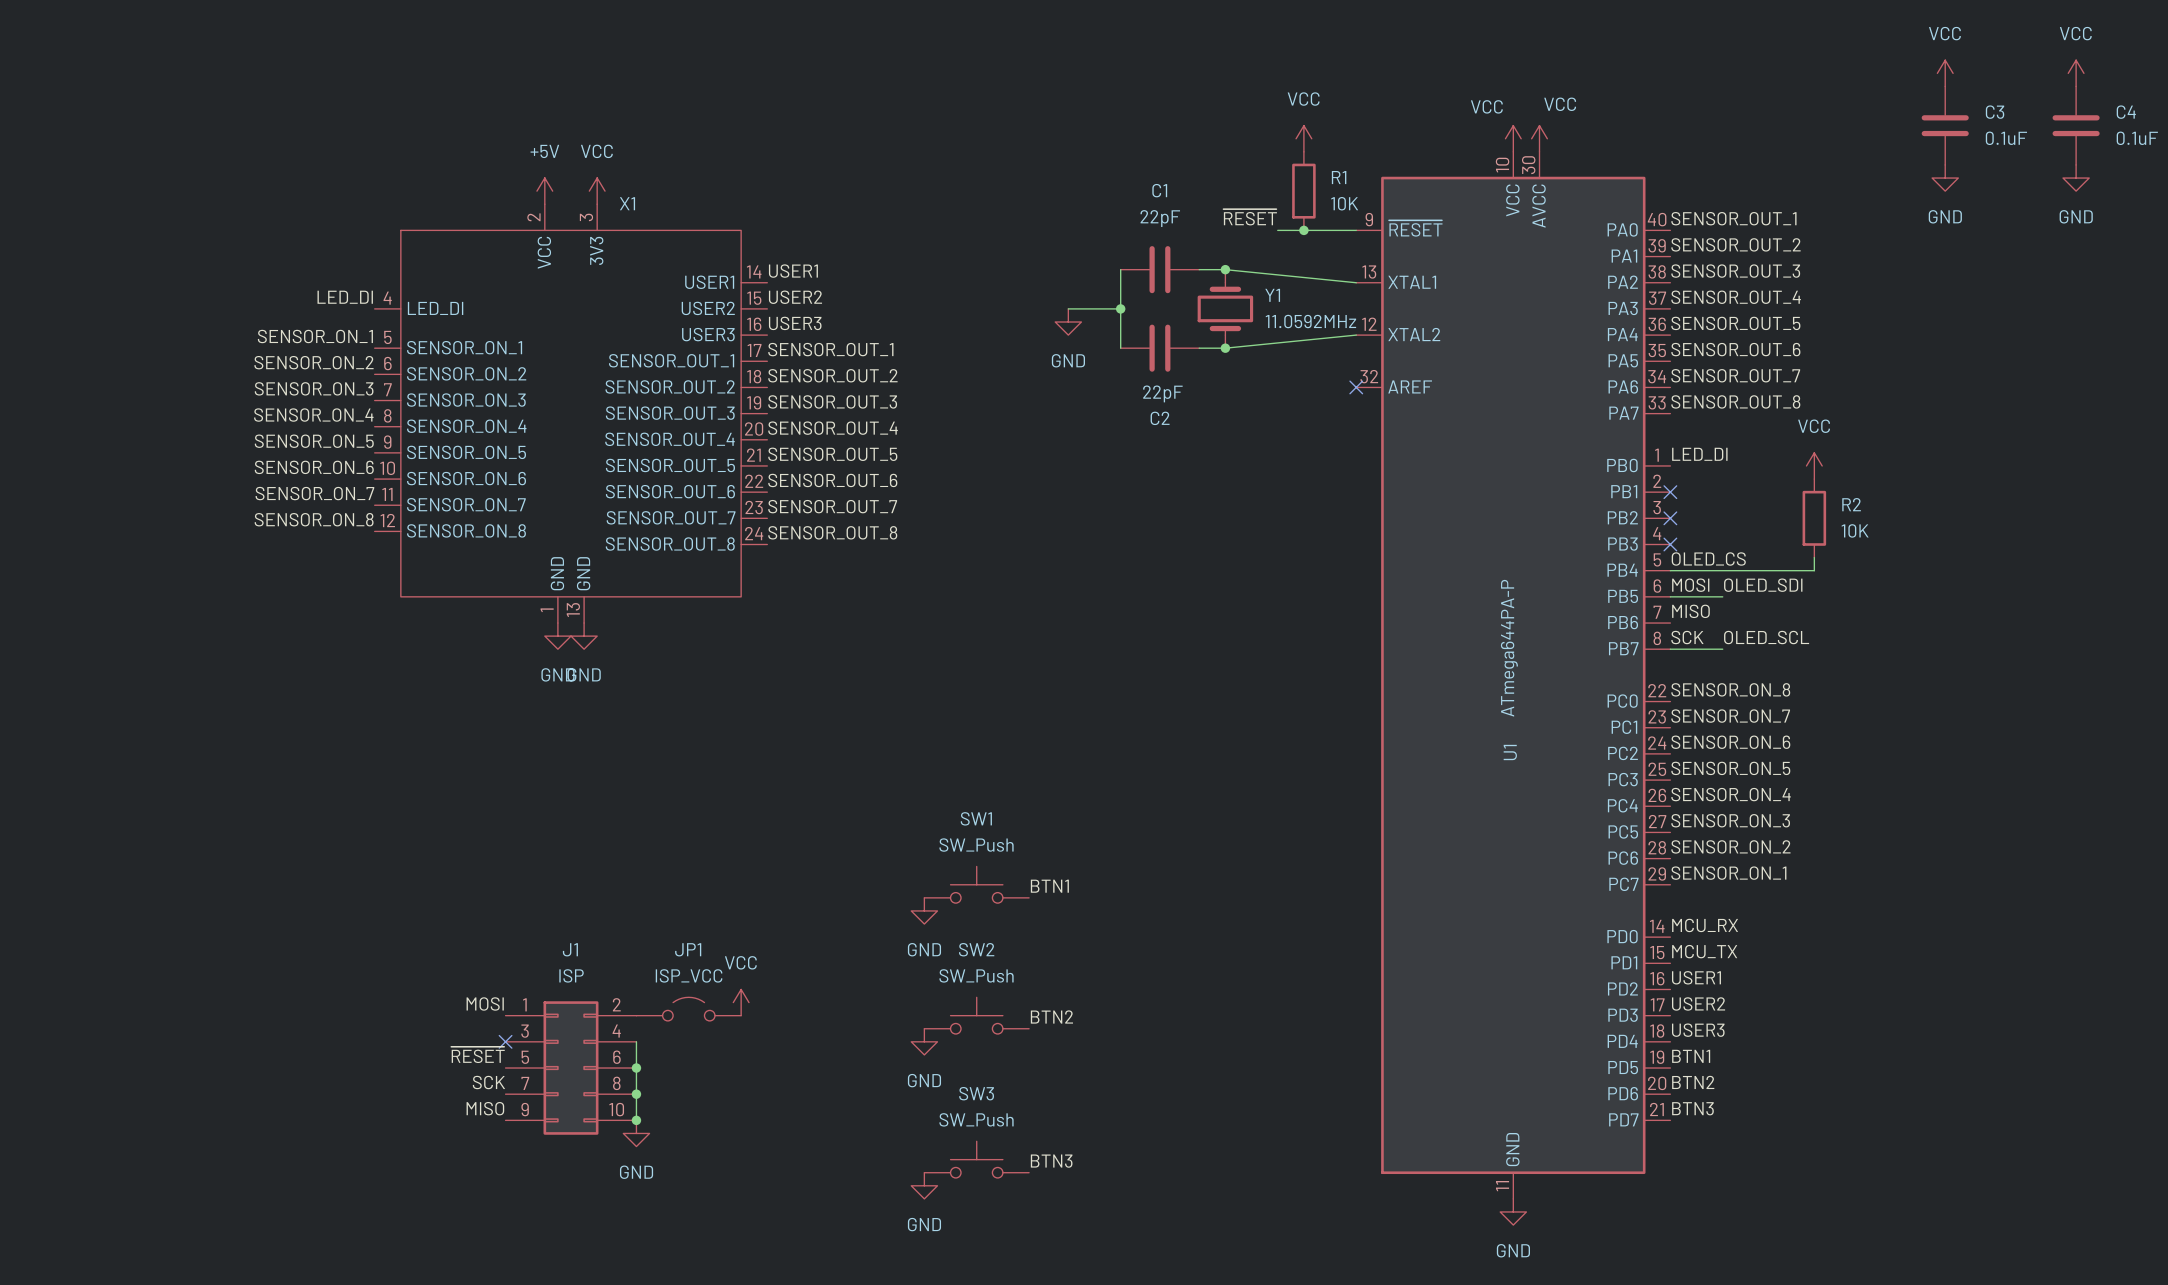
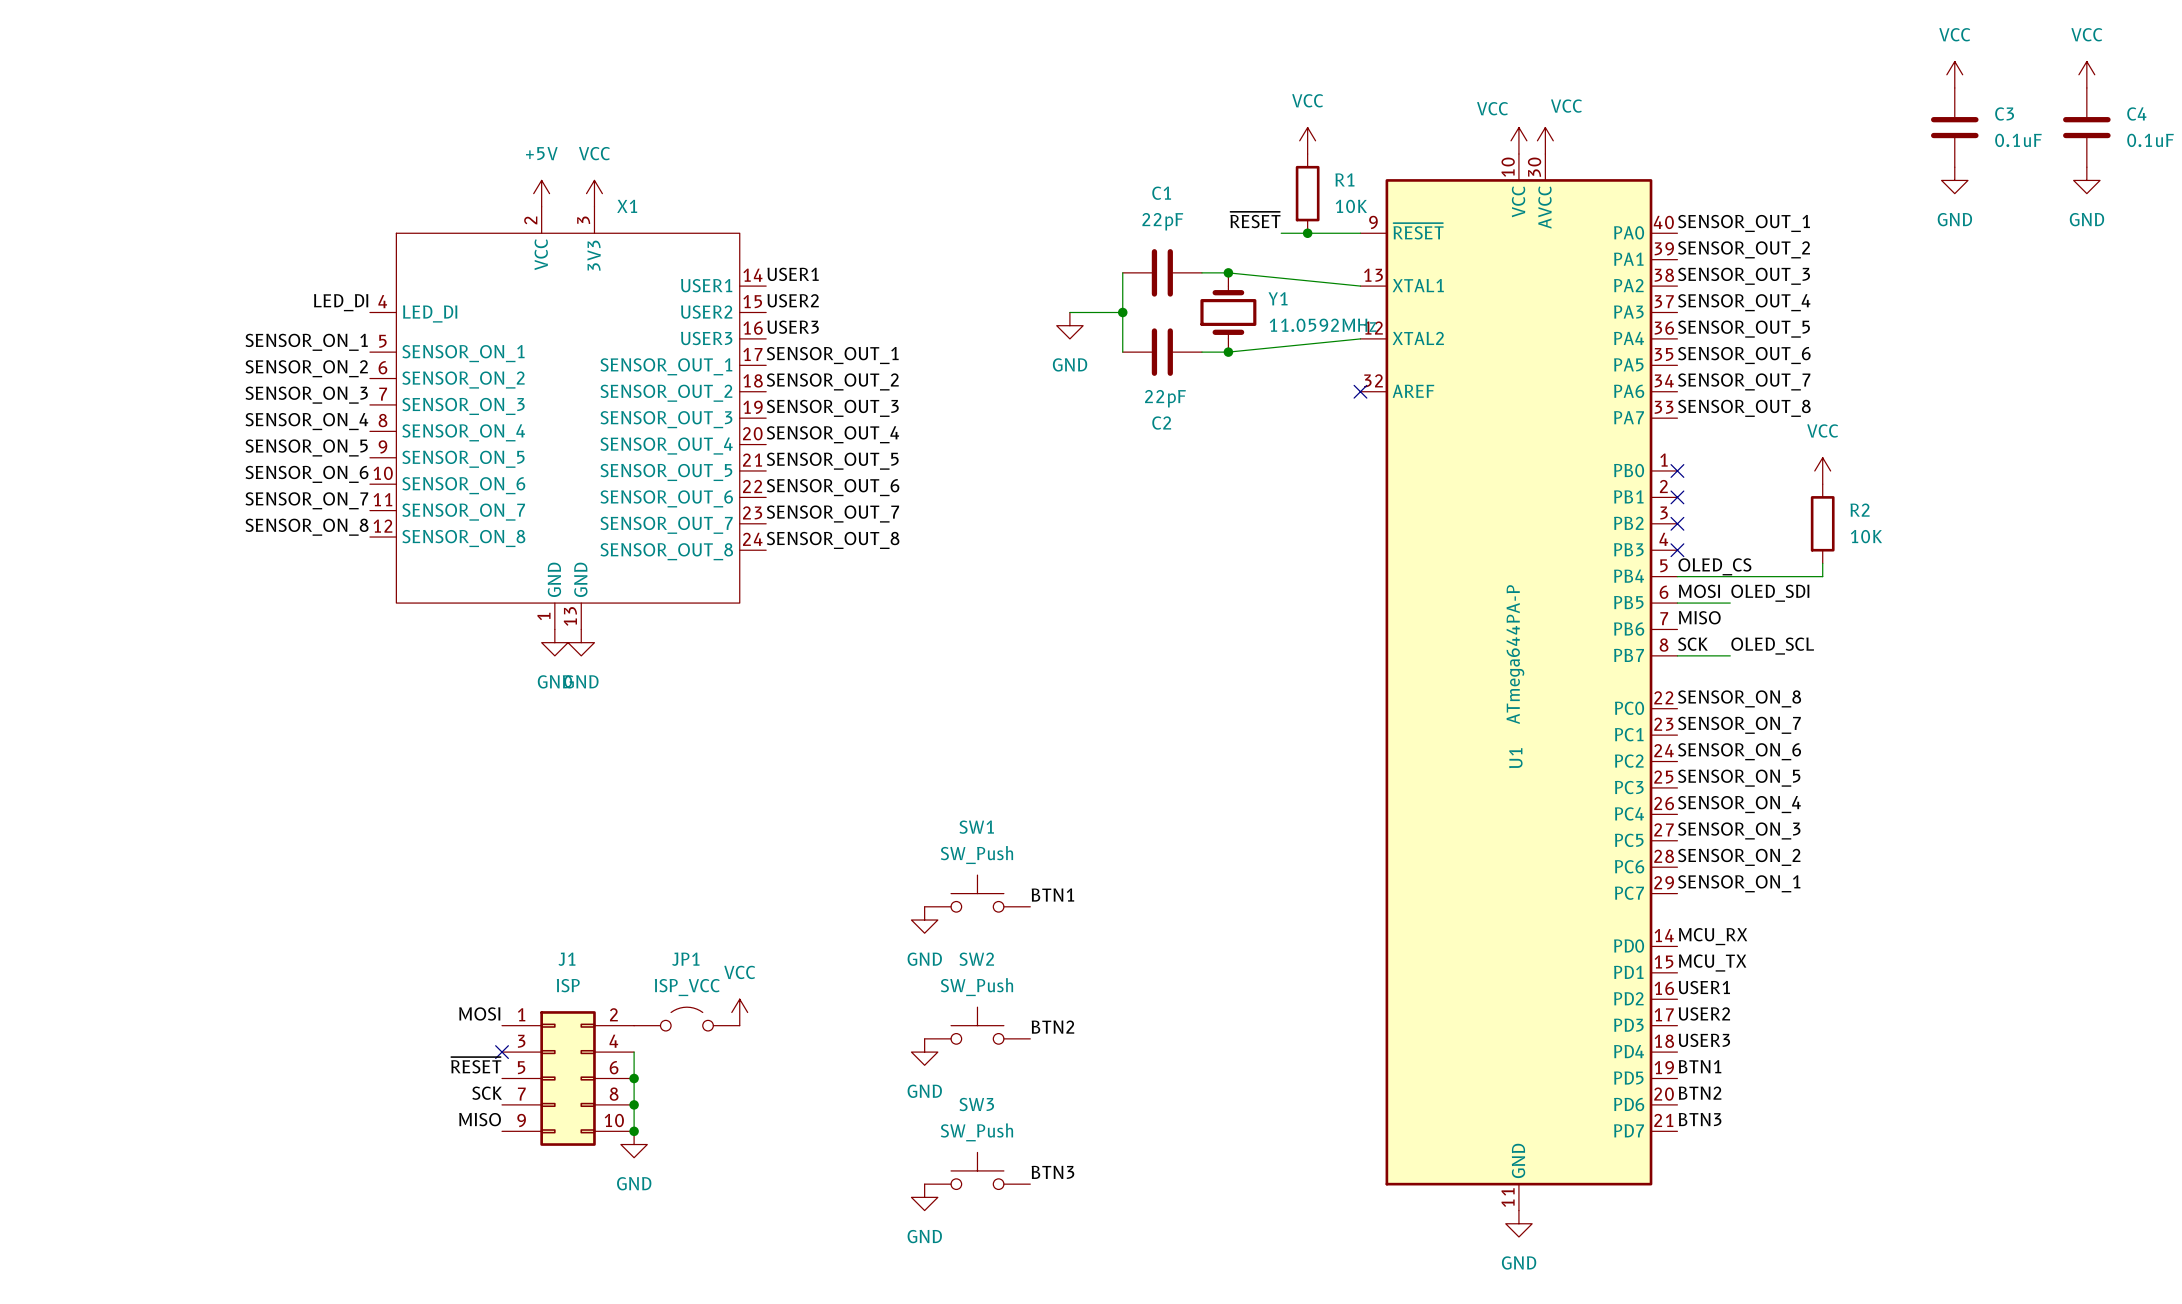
label: LED_DI (1699, 454) -> none
no-connect mark: none -> (1677, 470)

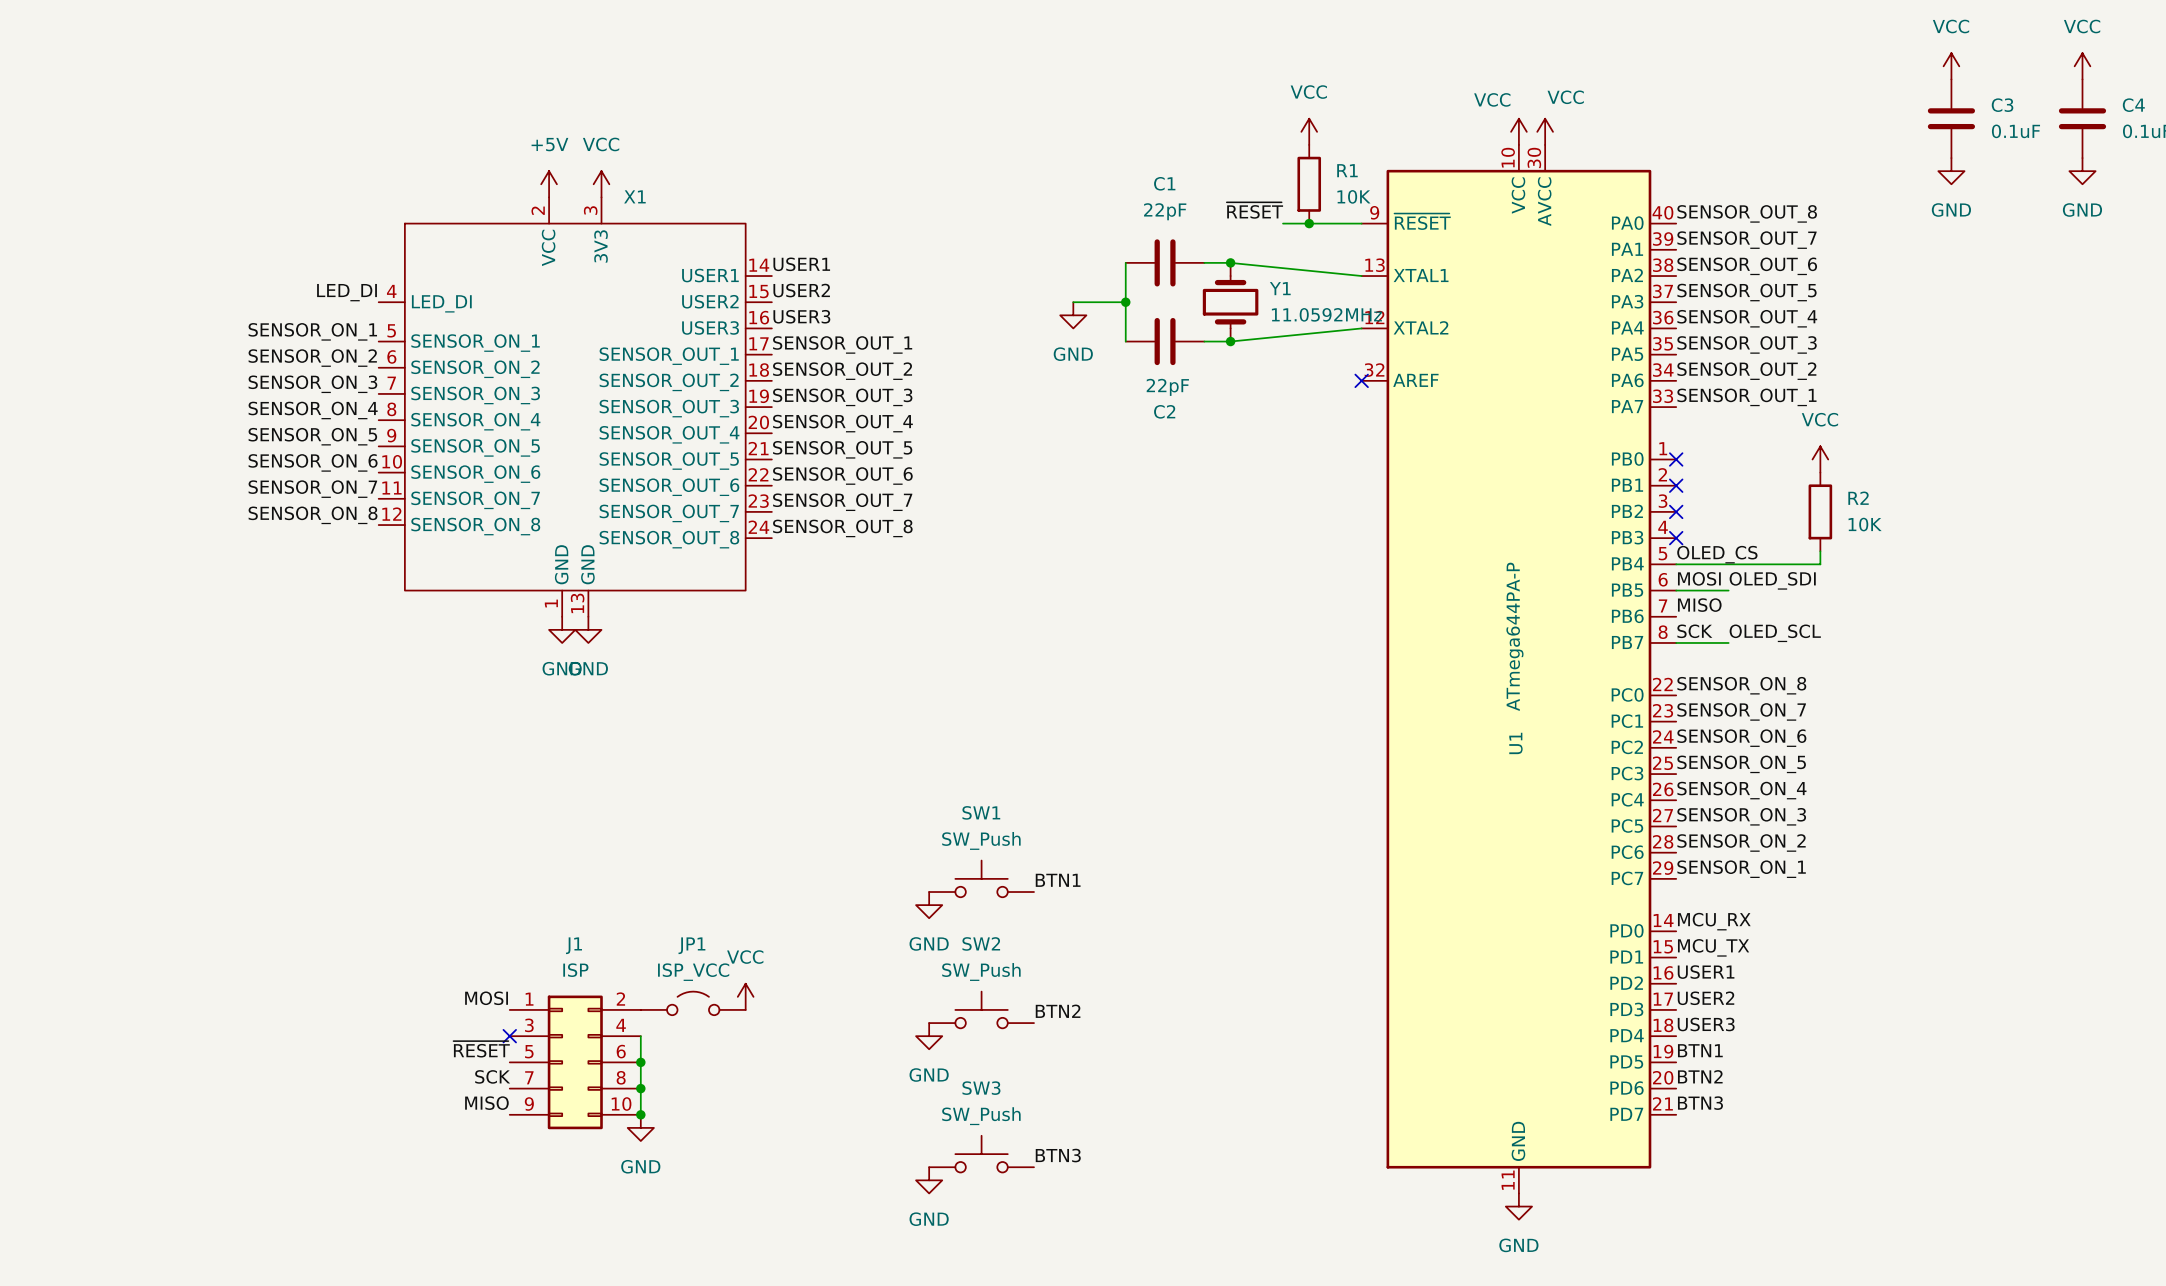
label: SENSOR_OUT_1 (1744, 223) -> SENSOR_OUT_8 (1747, 213)
label: SENSOR_OUT_2 (1744, 249) -> SENSOR_OUT_7 (1747, 240)
label: SENSOR_OUT_3 (1744, 276) -> SENSOR_OUT_6 (1747, 266)
label: SENSOR_OUT_4 (1744, 302) -> SENSOR_OUT_5 (1747, 292)
label: SENSOR_OUT_5 (1744, 329) -> SENSOR_OUT_4 (1747, 318)
label: SENSOR_OUT_6 (1744, 355) -> SENSOR_OUT_3 (1747, 344)
label: SENSOR_OUT_7 (1744, 381) -> SENSOR_OUT_2 (1746, 371)
label: SENSOR_OUT_8 (1744, 408) -> SENSOR_OUT_1 (1746, 397)

